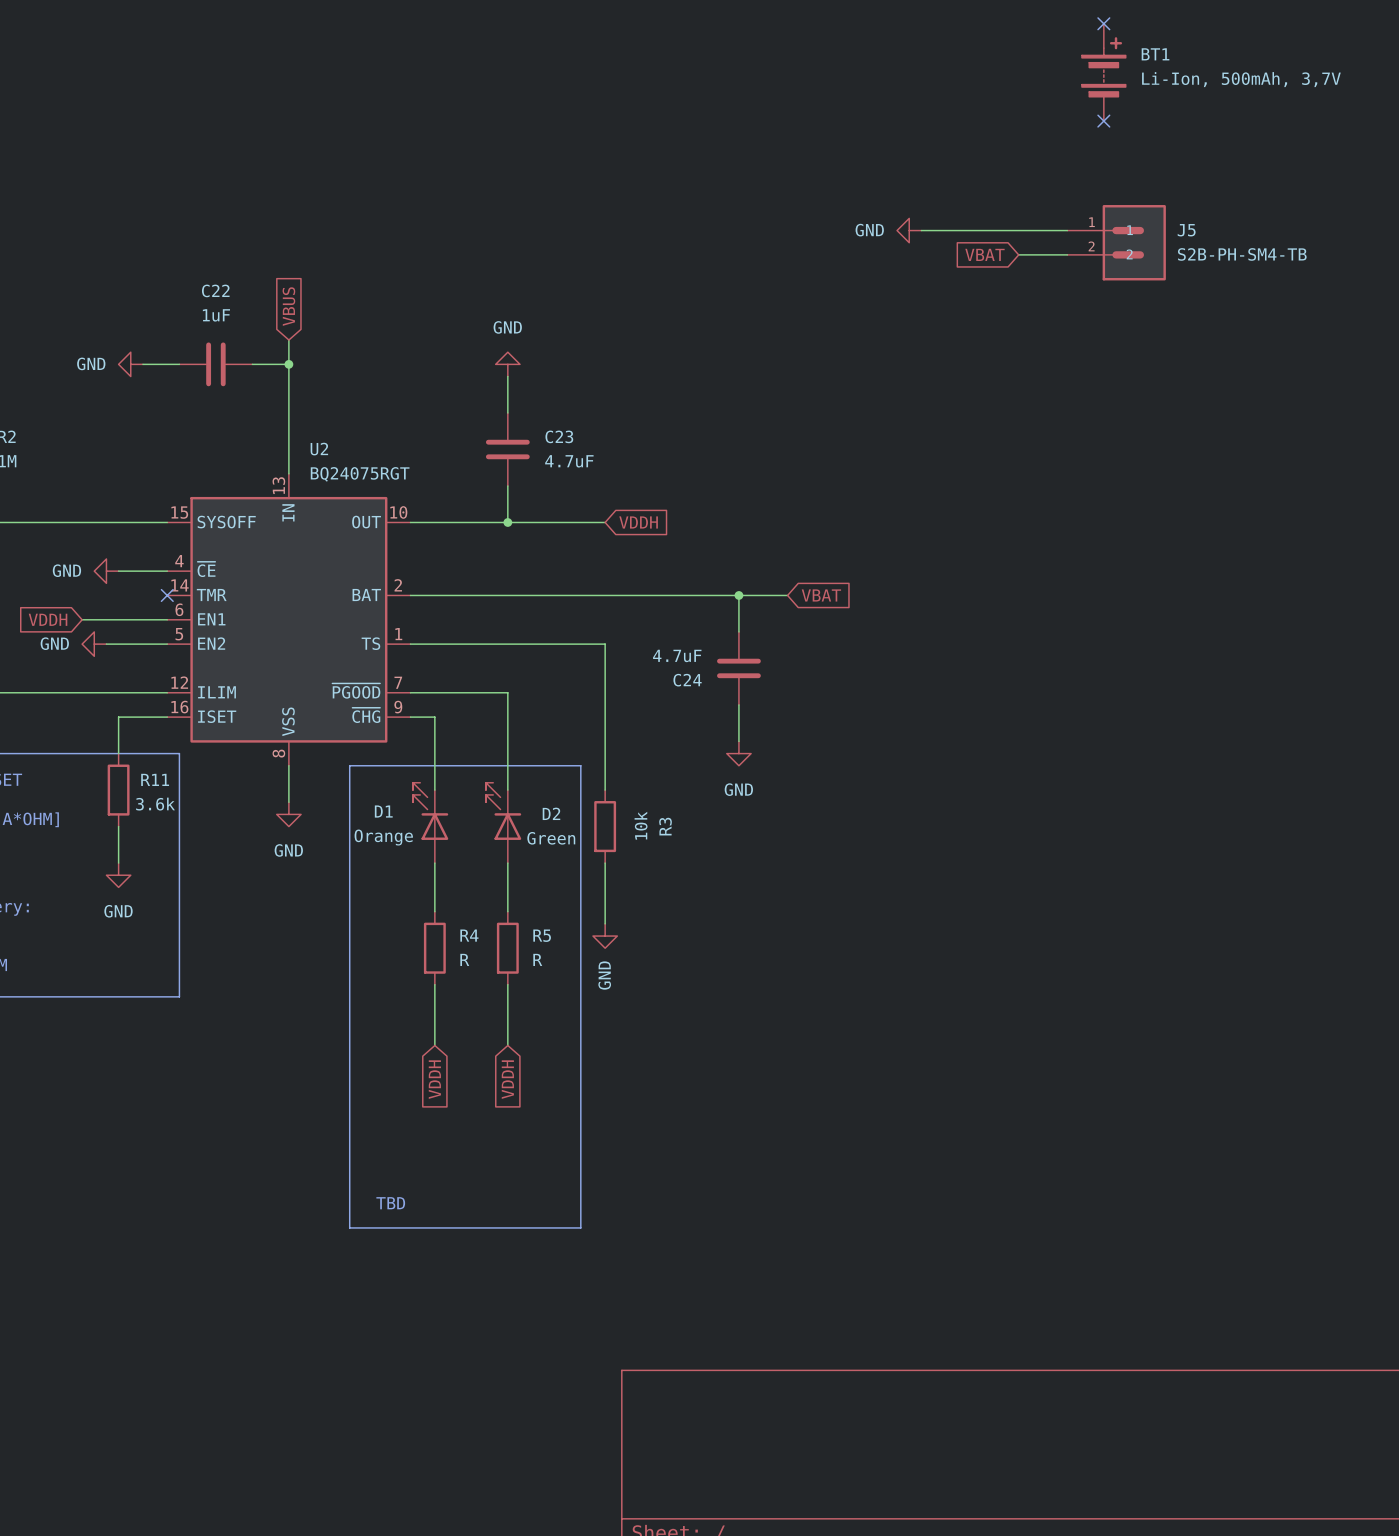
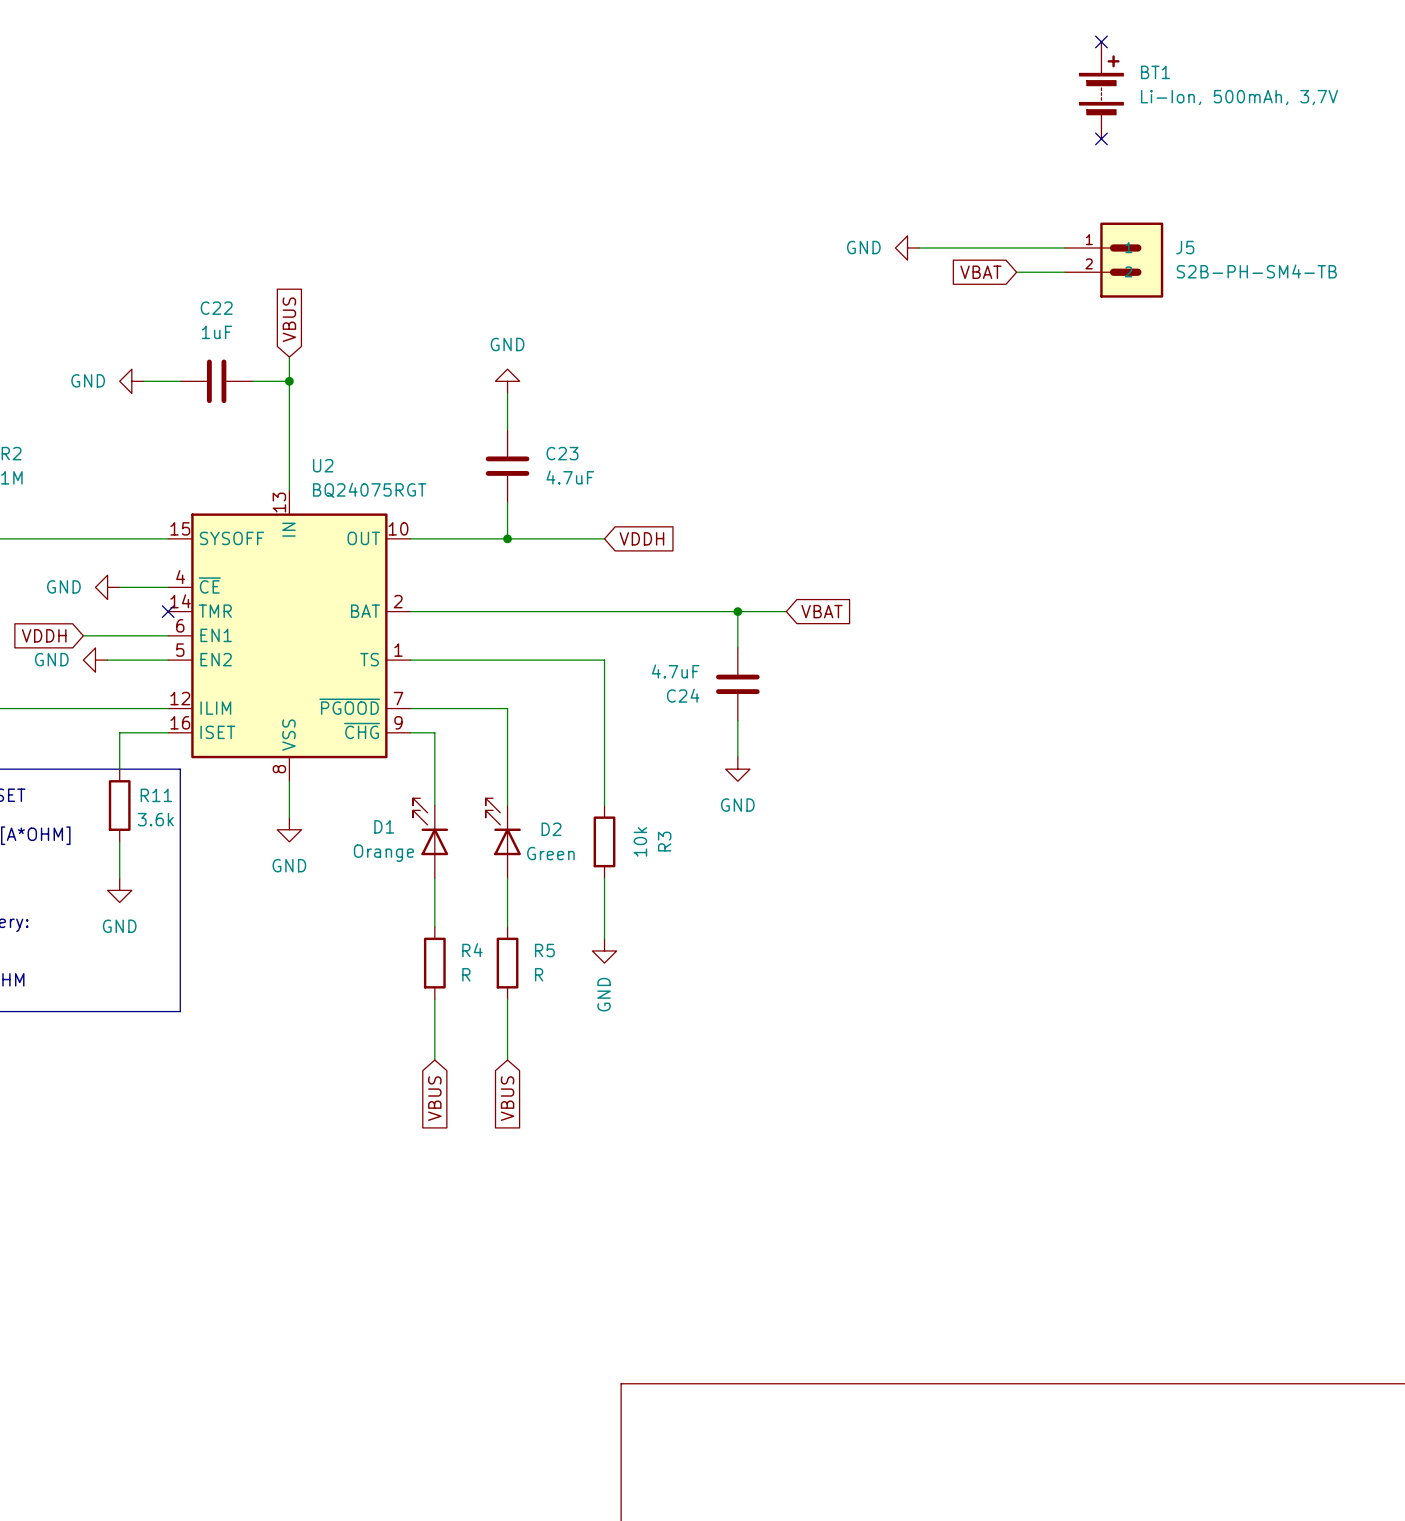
line: (349, 765) (580, 765) (580, 1227) (349, 1227) (349, 765) -> none
global label: VDDH (434, 1079) -> VBUS (434, 1098)
global label: VDDH (507, 1079) -> VBUS (507, 1098)
text: TBD (390, 1203) -> none

